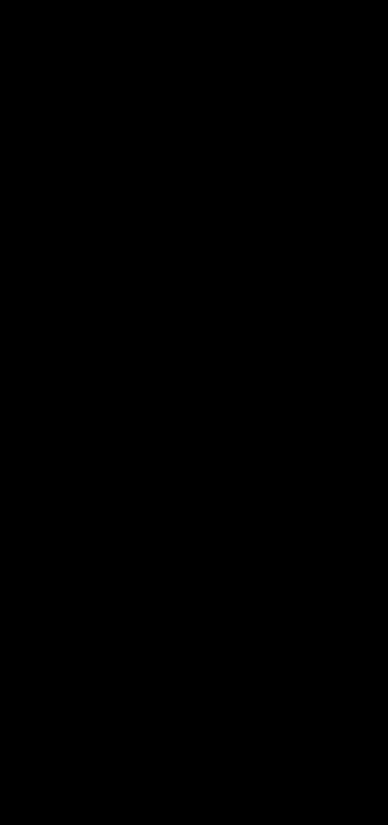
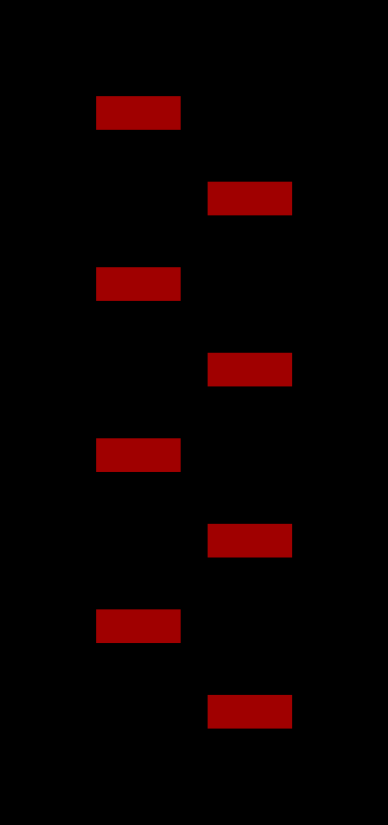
part: none -> (194, 412)

